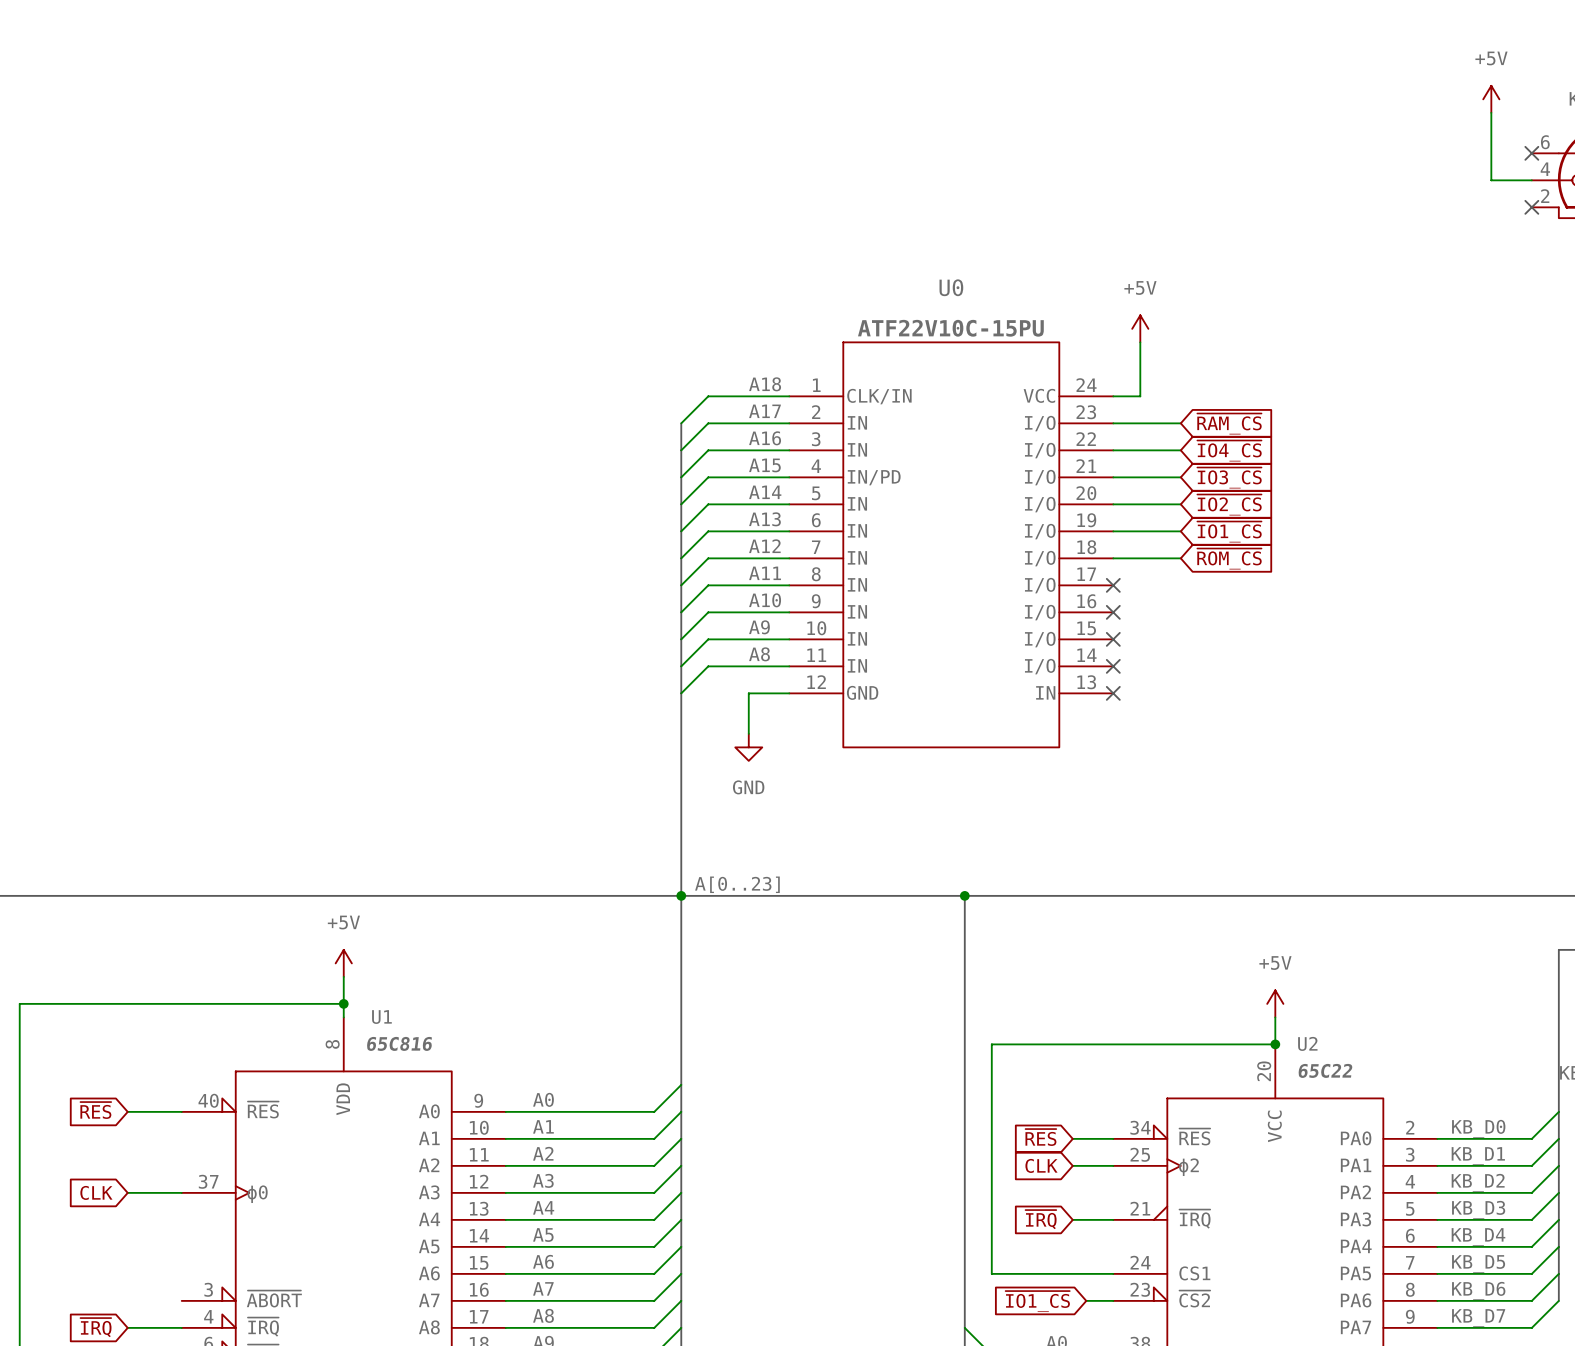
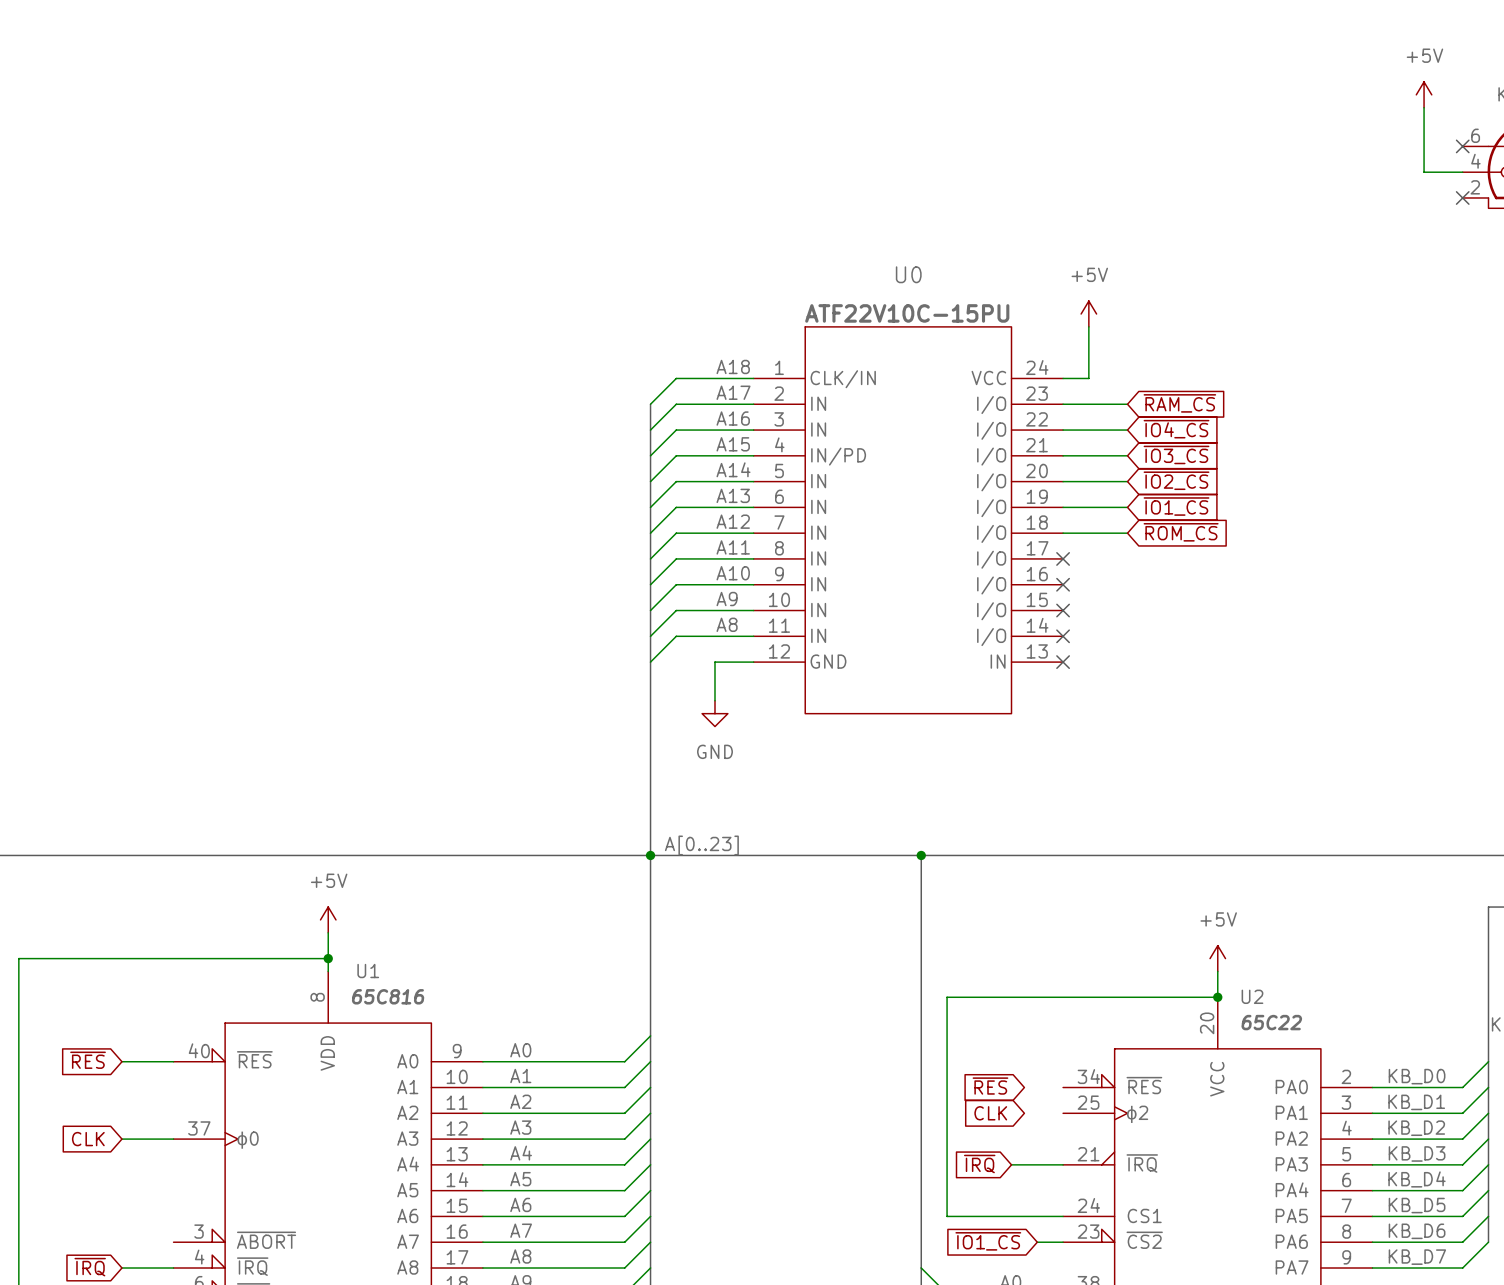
wire: (1072, 1138) (1113, 1138) -> none
wire: (1072, 1165) (1113, 1165) -> none
global label position: ~{IRQ} (1041, 1219) -> ~{IRQ} (979, 1164)
wire: none -> (1011, 1164) (1024, 1164)

